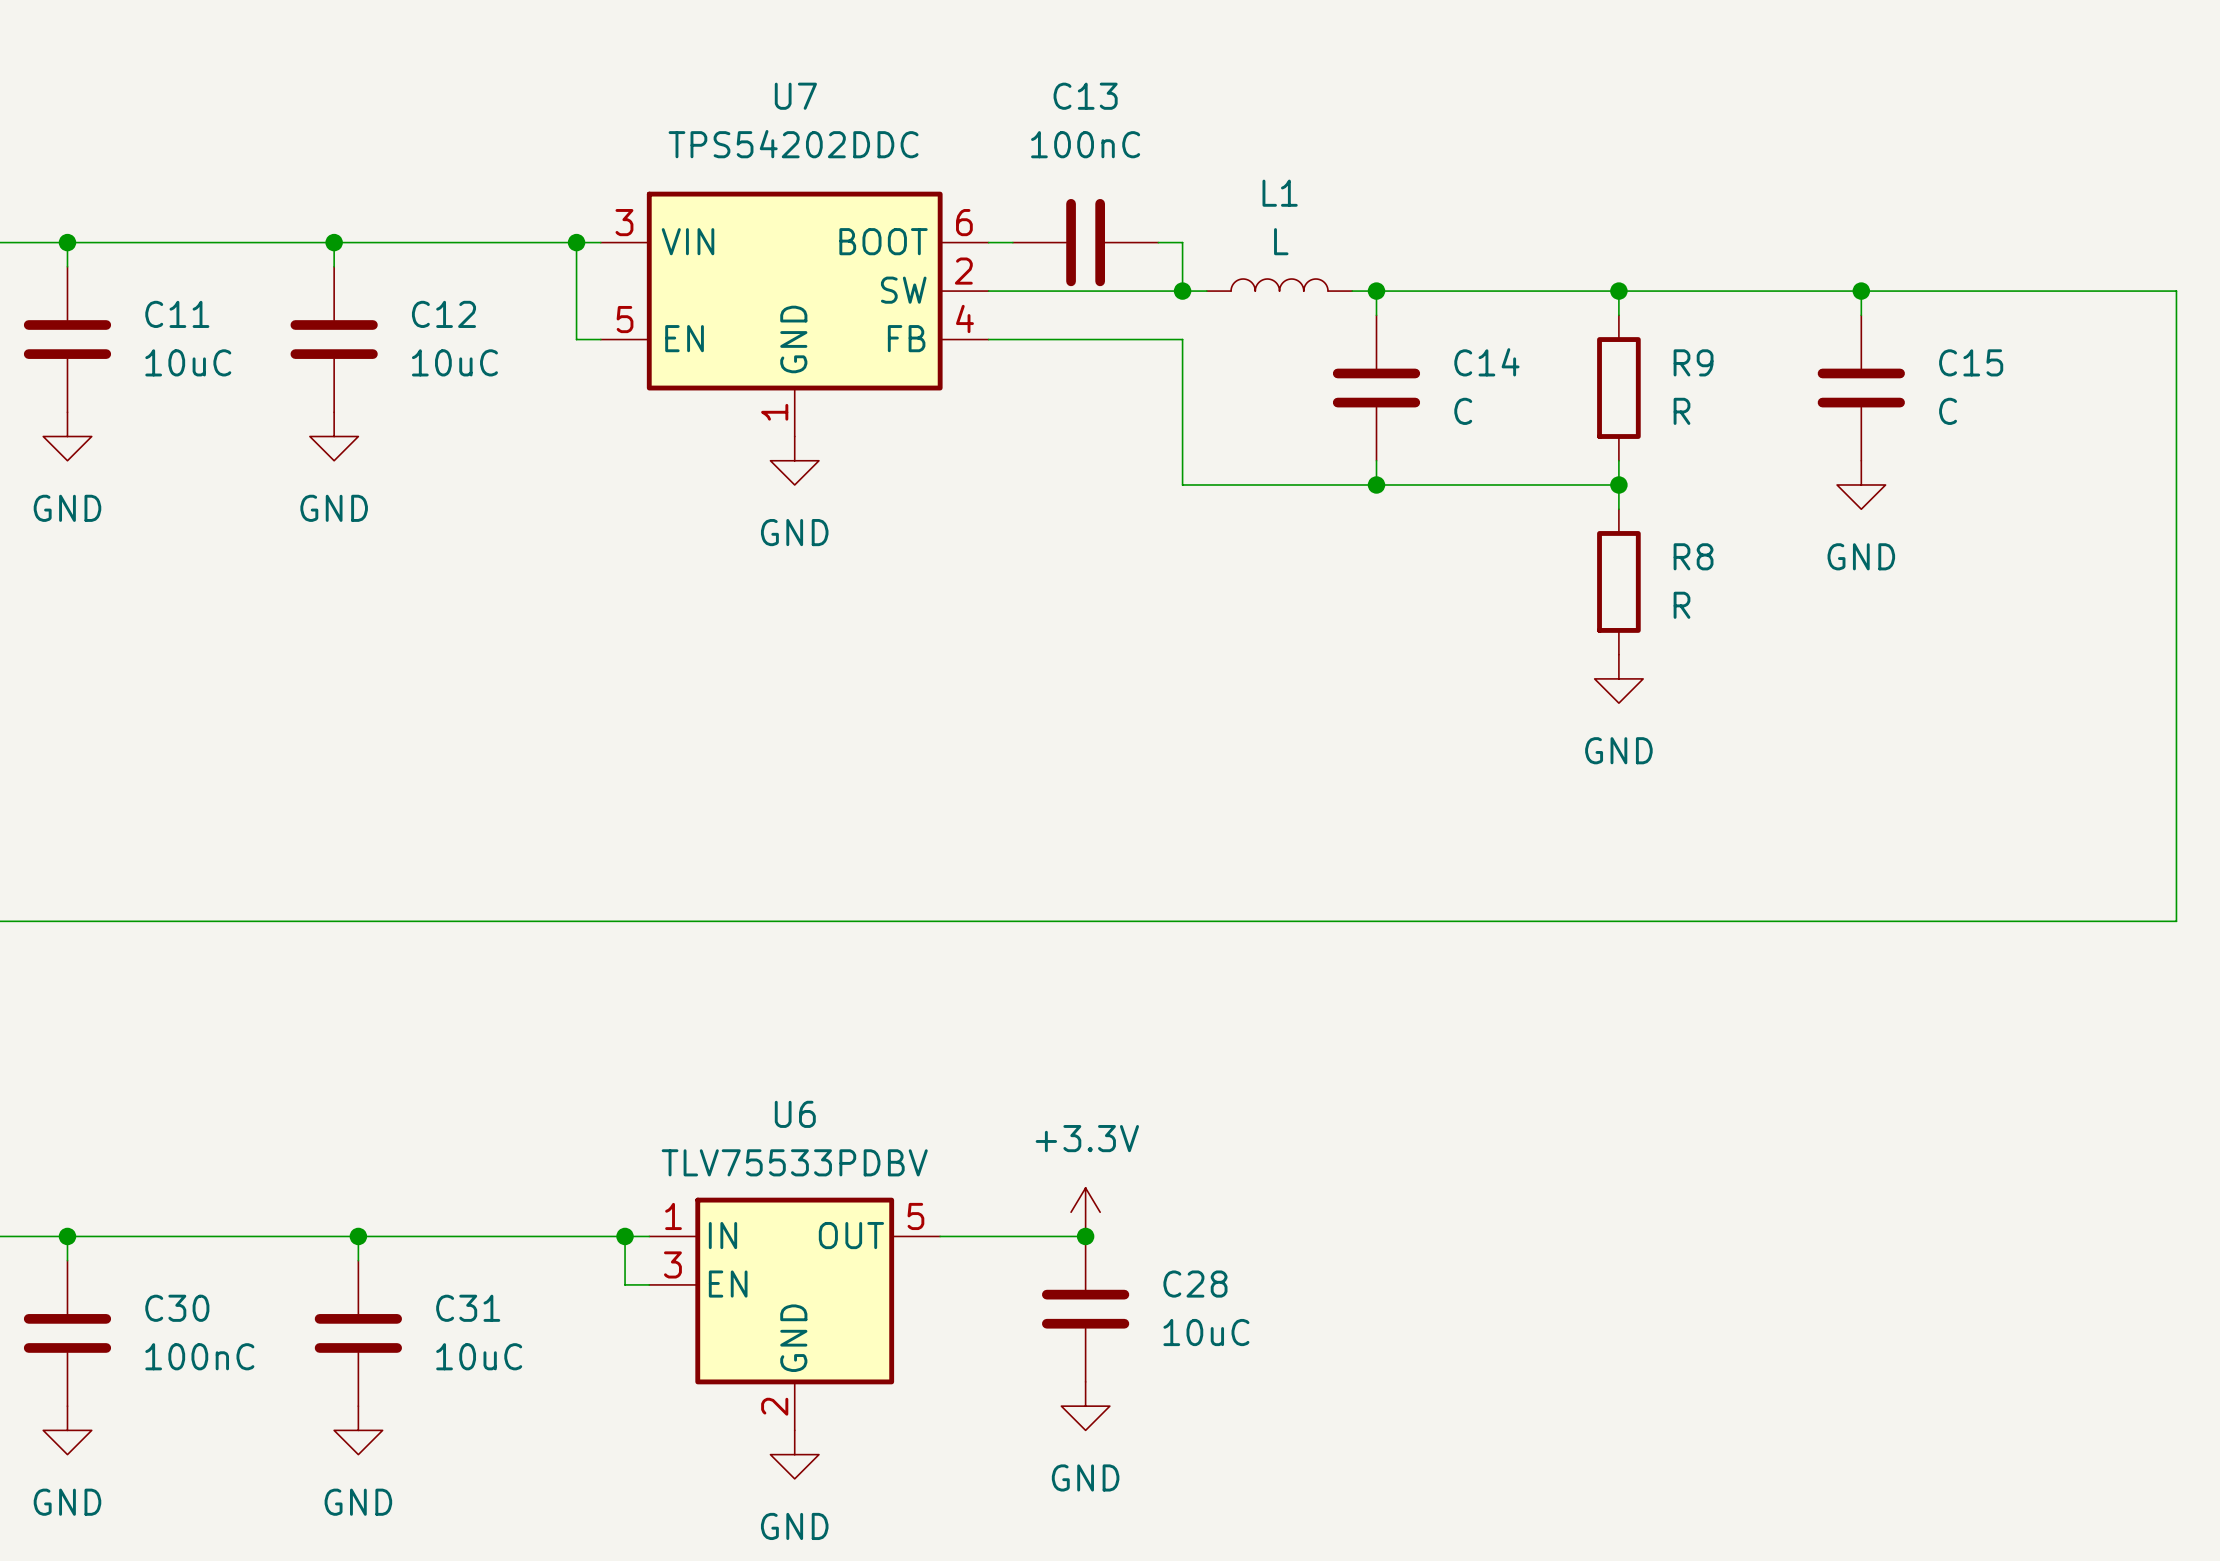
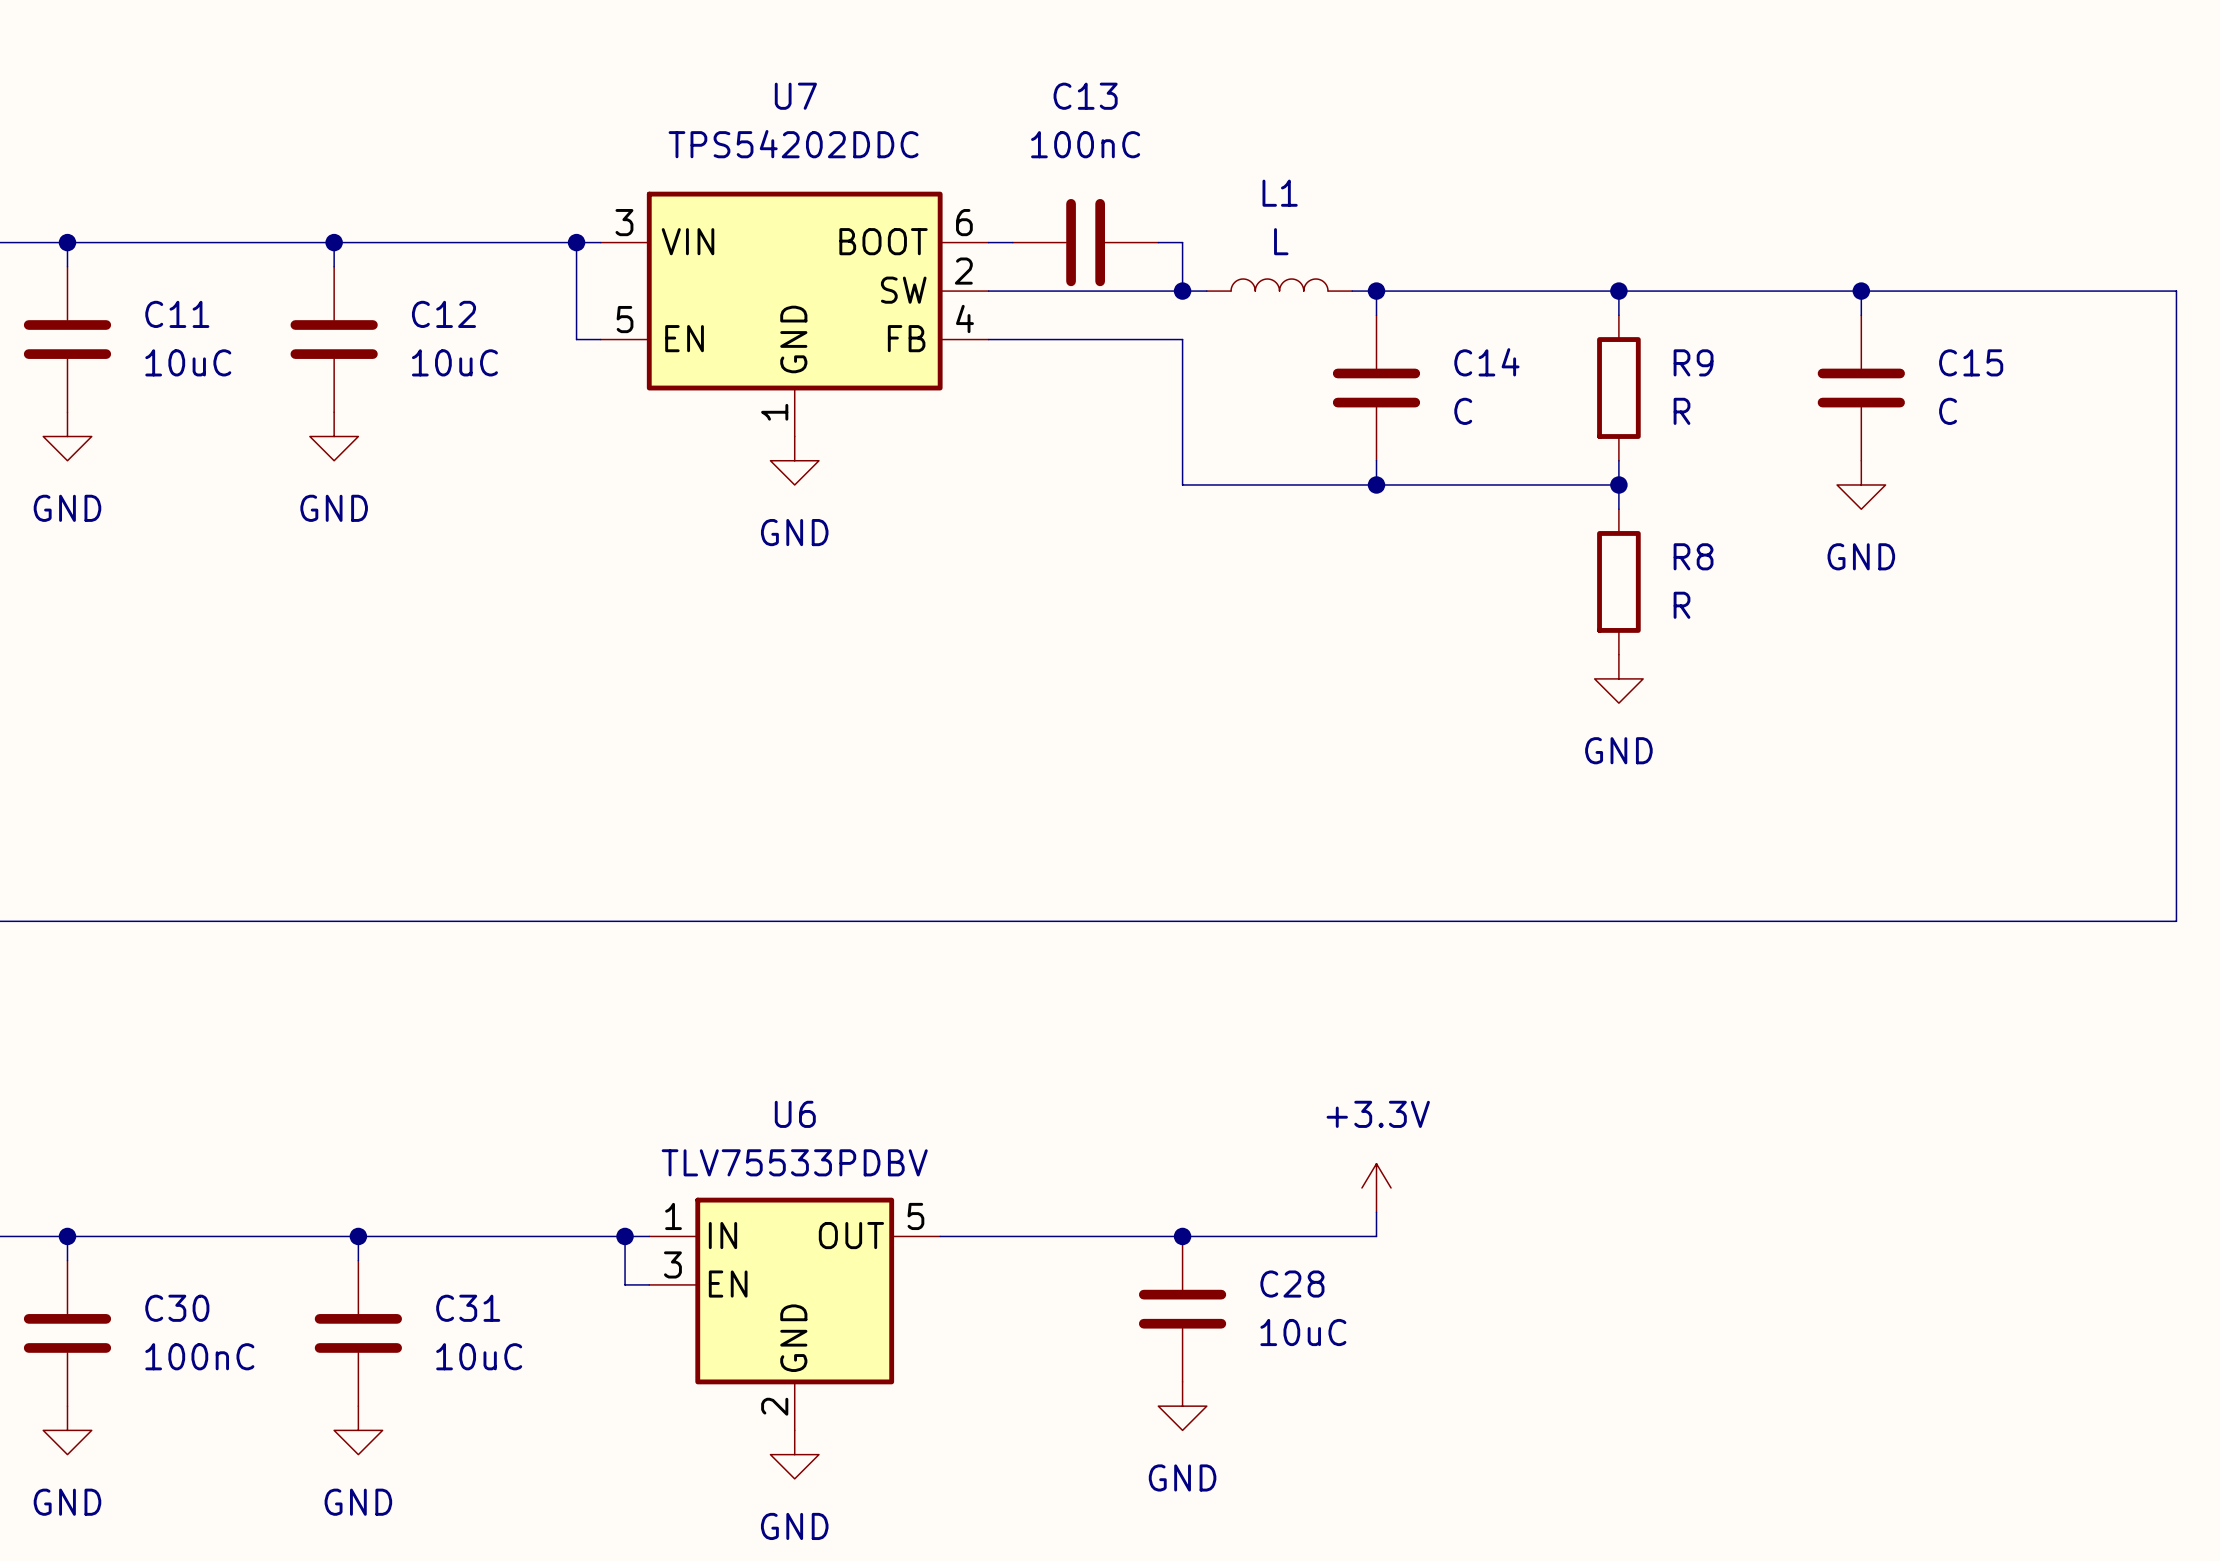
power symbol position: +3.3V (1085, 1212) -> +3.3V (1376, 1187)
wire: none -> (1376, 1212) (1376, 1236) (1085, 1236)
junction position: (1085, 1236) -> (1182, 1236)
C28 position: (1085, 1309) -> (1182, 1309)
power symbol position: GND (1085, 1406) -> GND (1182, 1406)

